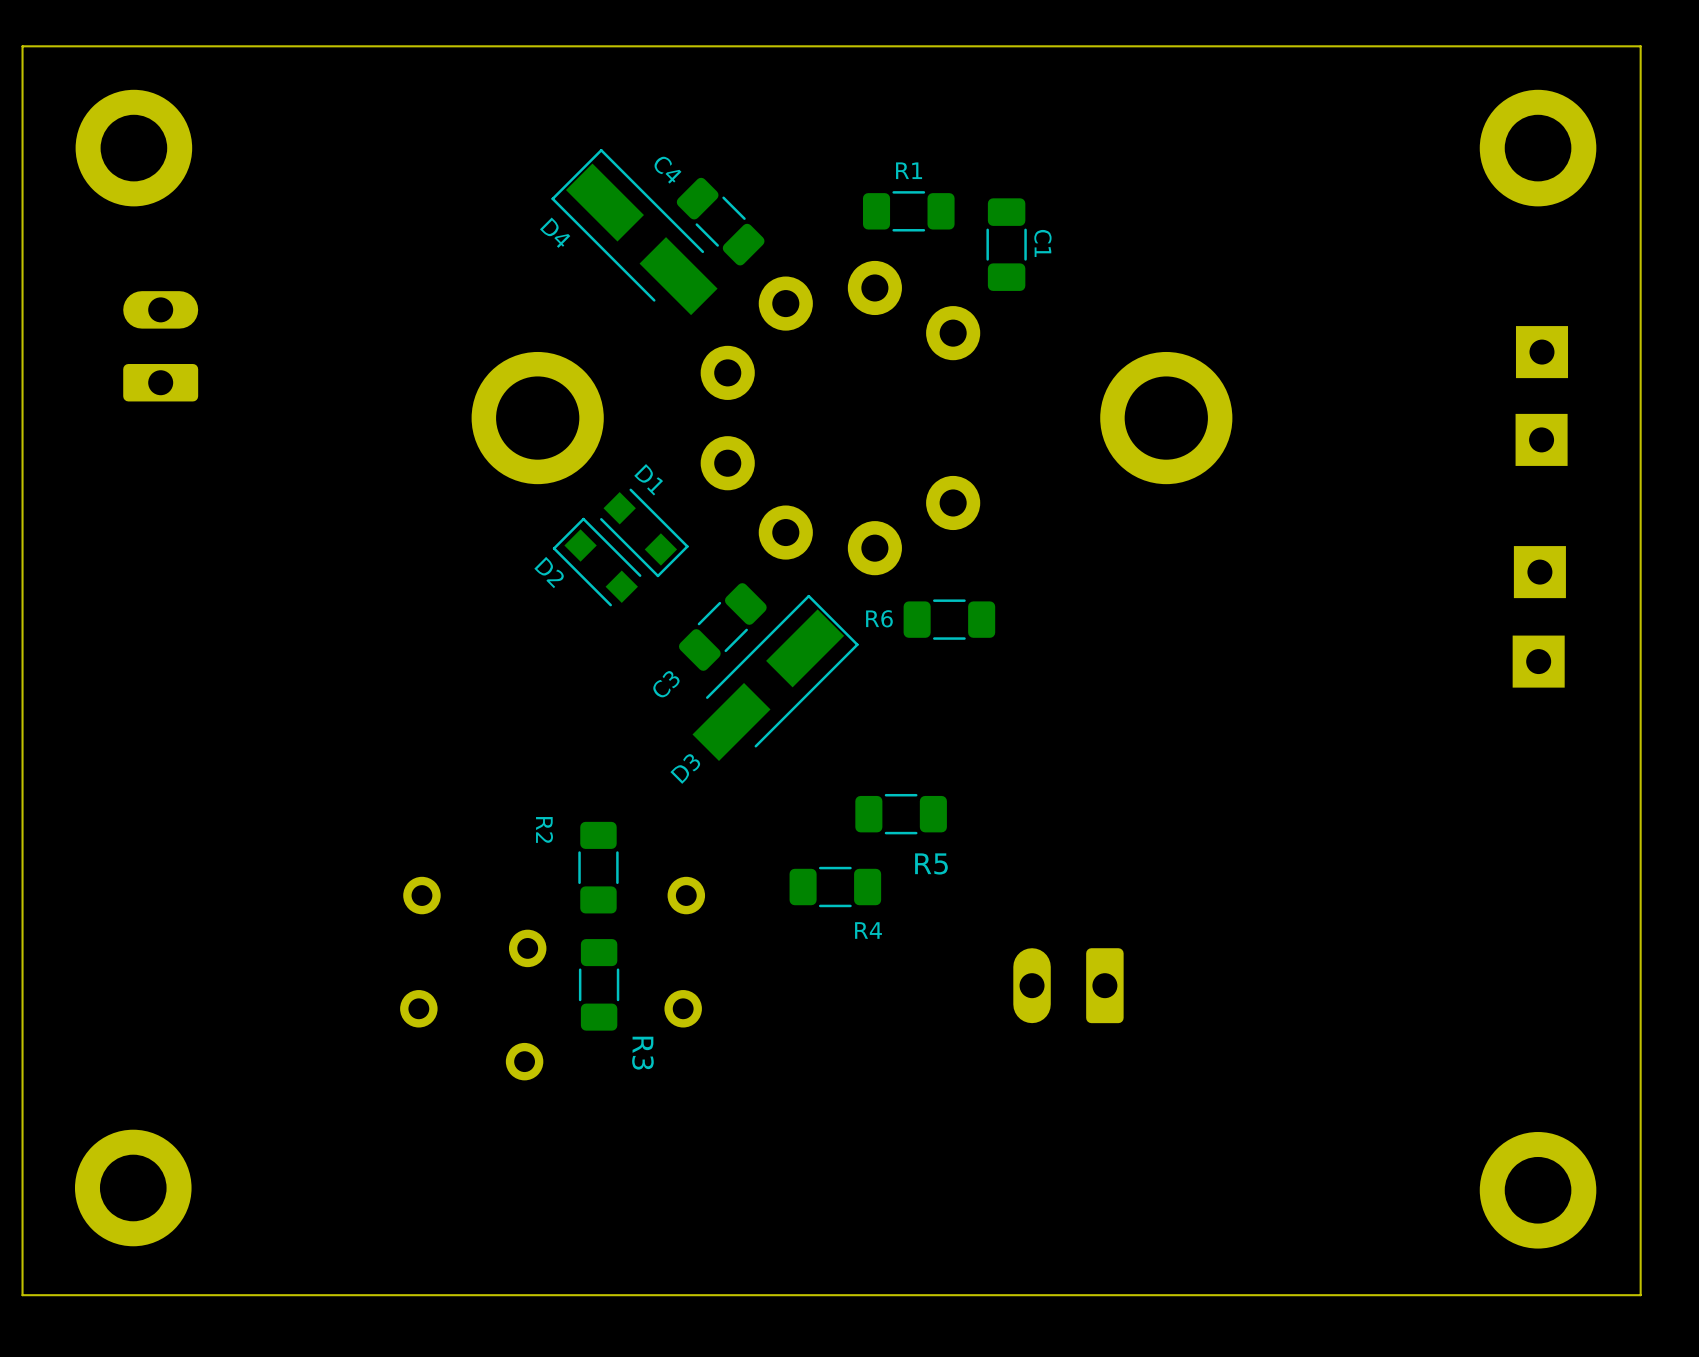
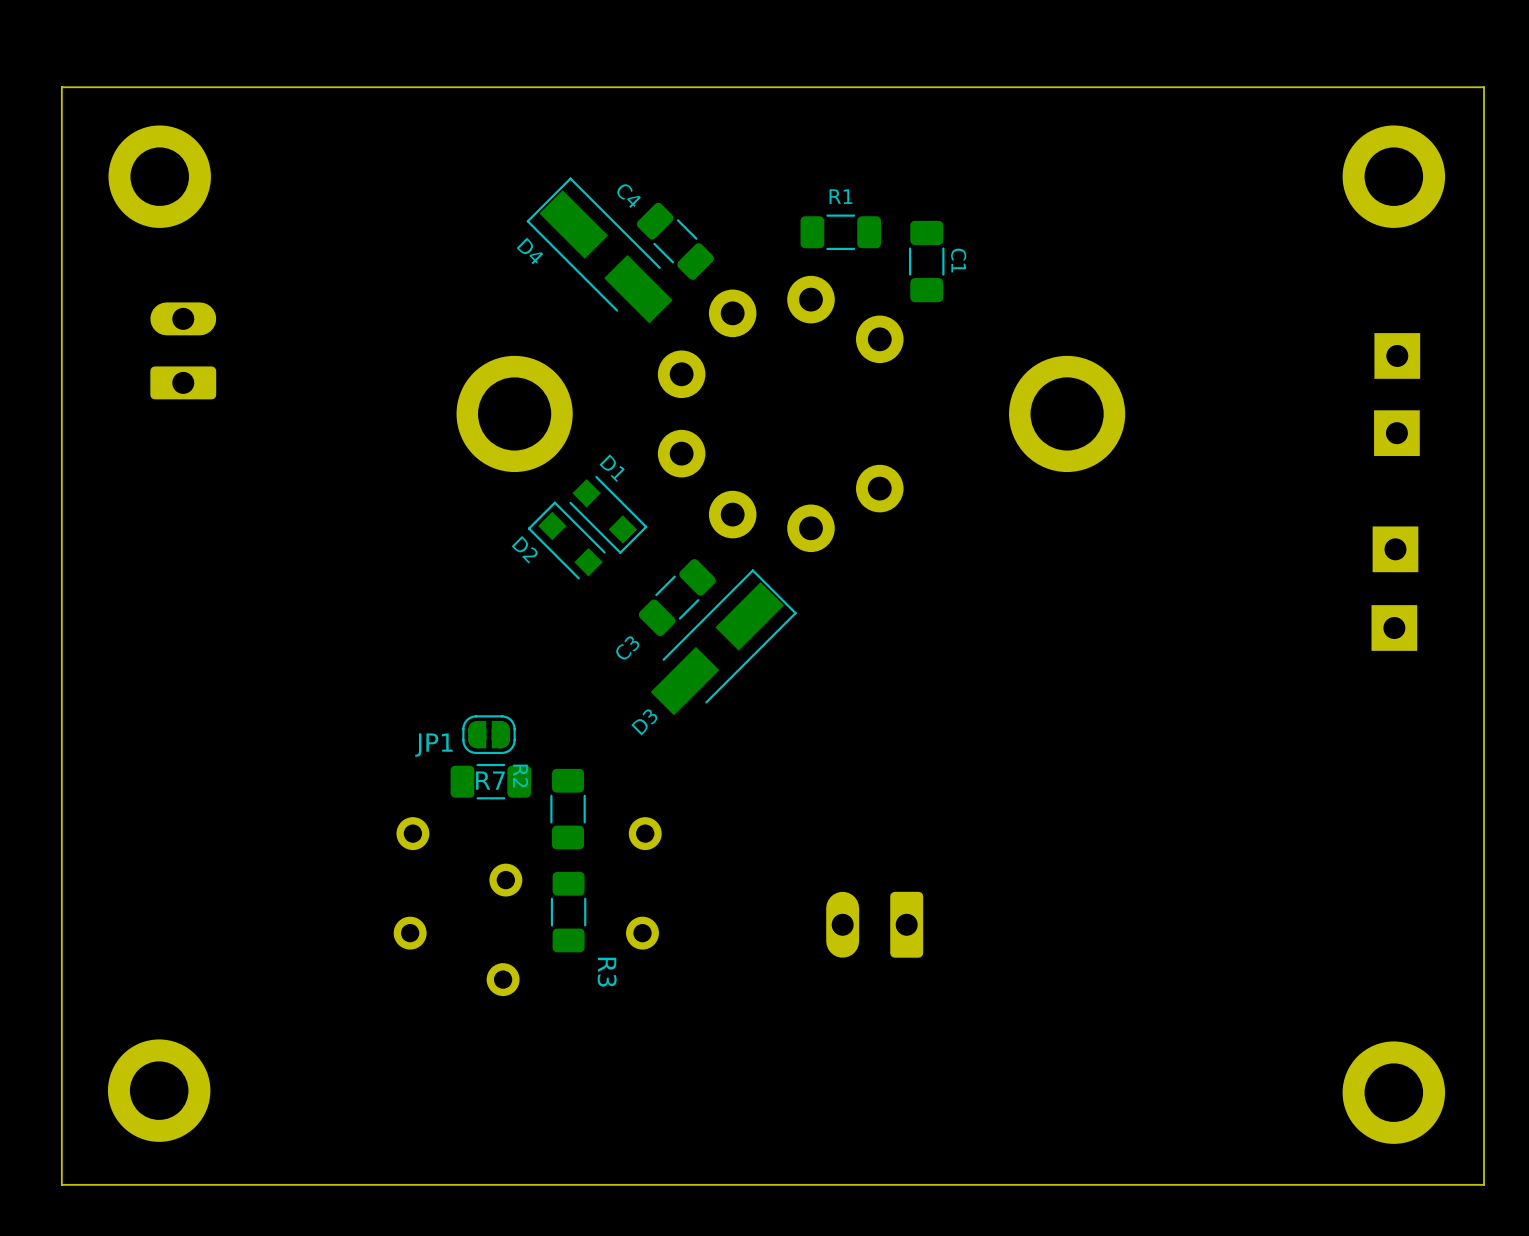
R6: (949, 619) -> none
JP1: none -> (489, 734)
R5: (901, 814) -> none
R7: none -> (490, 781)
R4: (835, 887) -> none
part: (1068, 985) -> none
part: none -> (874, 924)

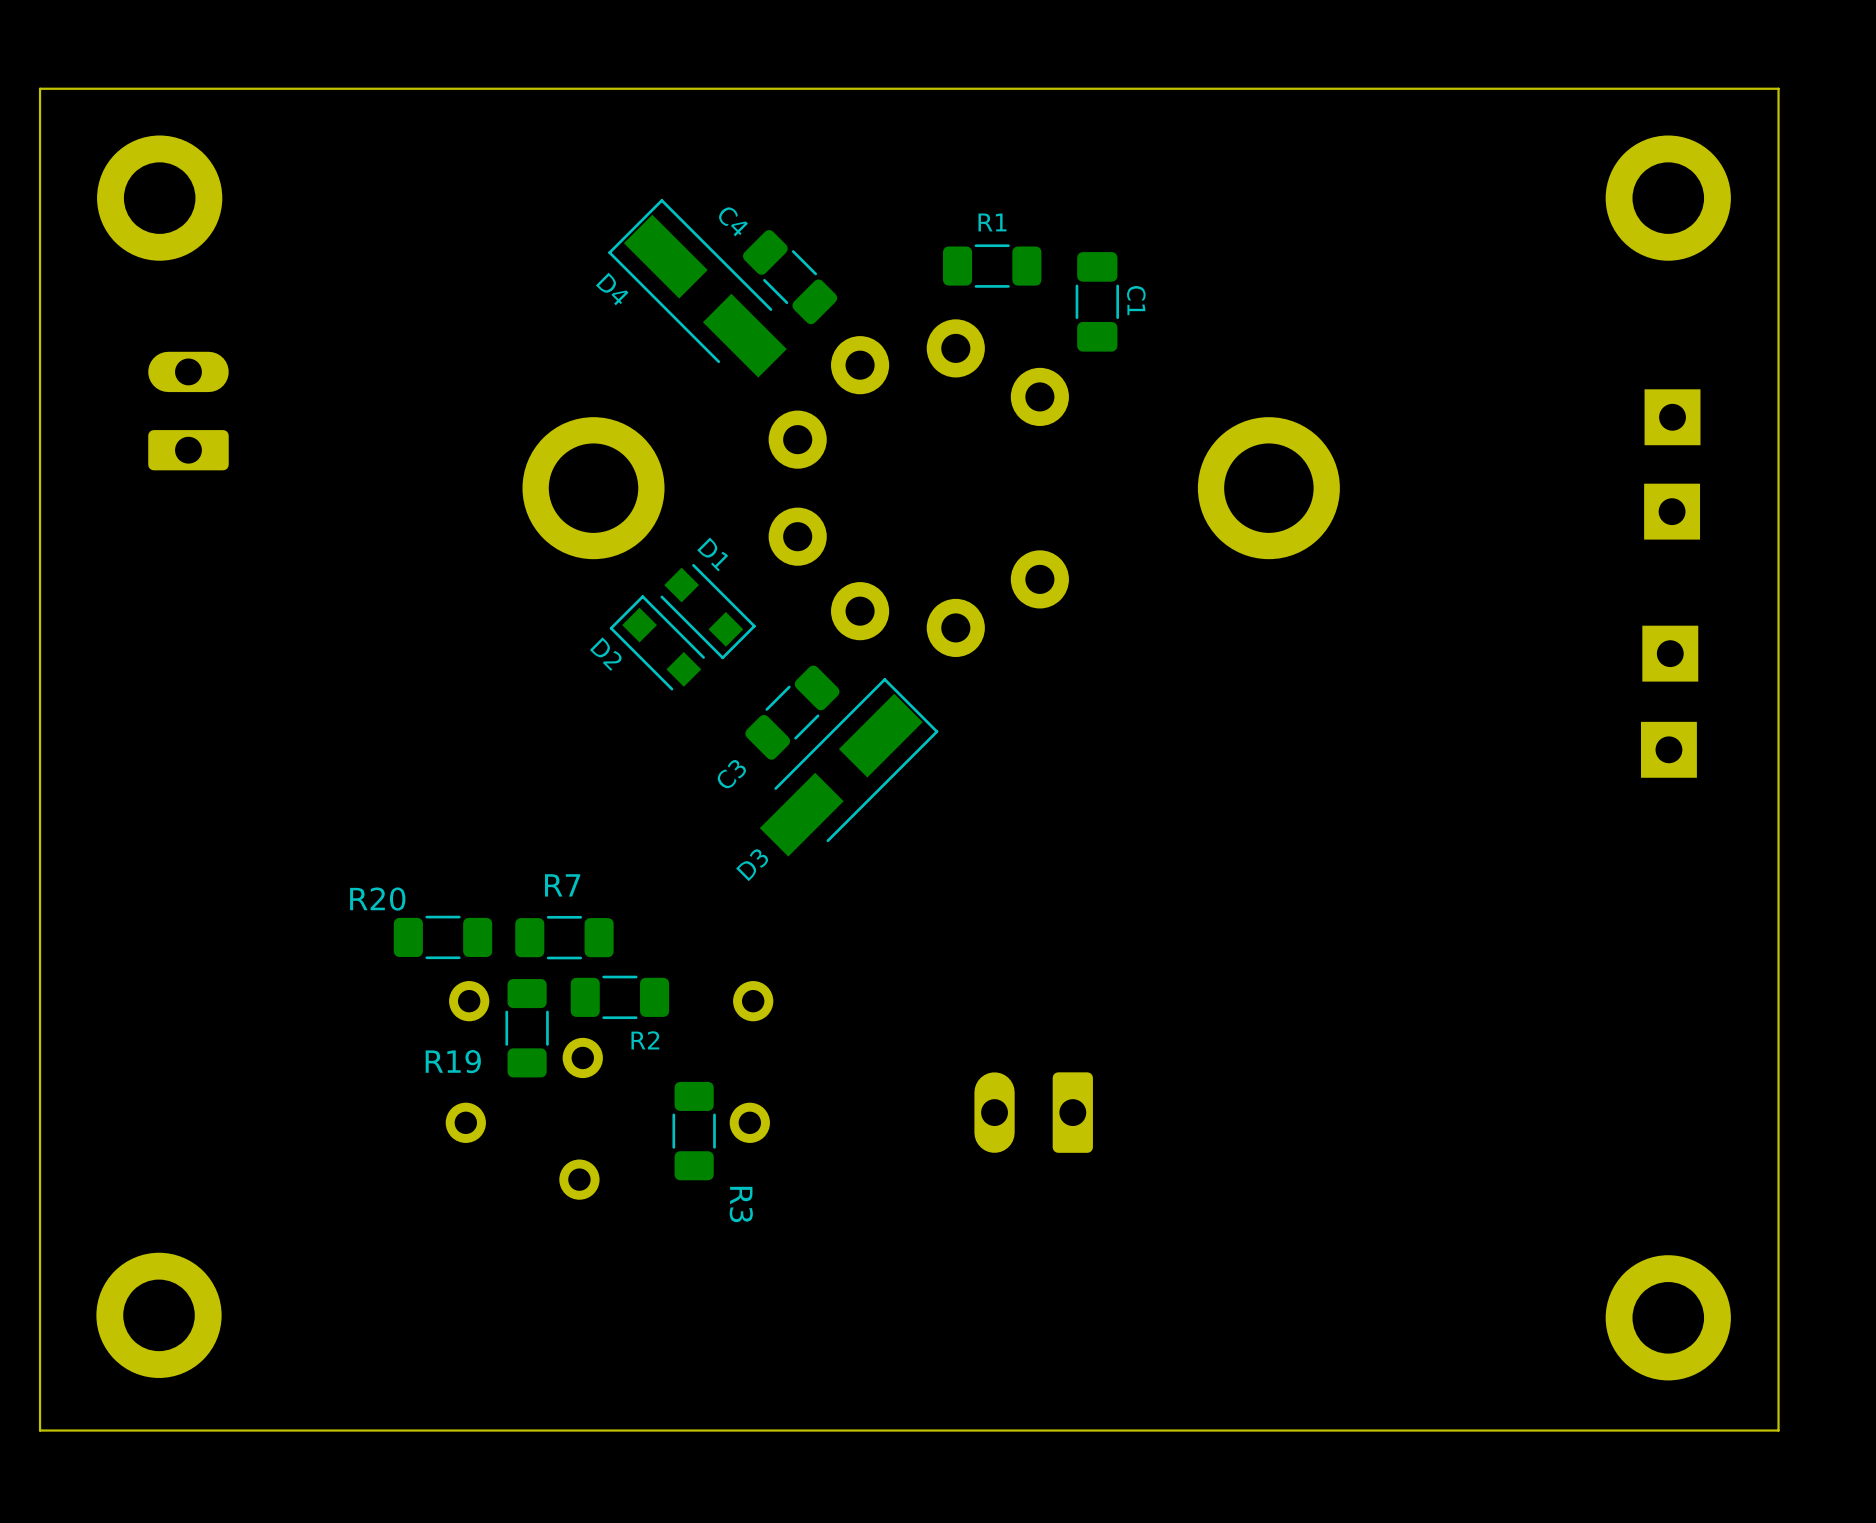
JP1: (489, 734) -> none
R2 name position: R2 (520, 775) -> R2 (645, 1040)
R7 name position: R7 (490, 780) -> R7 (562, 885)
R20: none -> (443, 937)
R2 rotation: 0° (568, 809) -> 90° clockwise (619, 997)
R19: none -> (527, 1028)
R3 position: (568, 912) -> (694, 1131)

